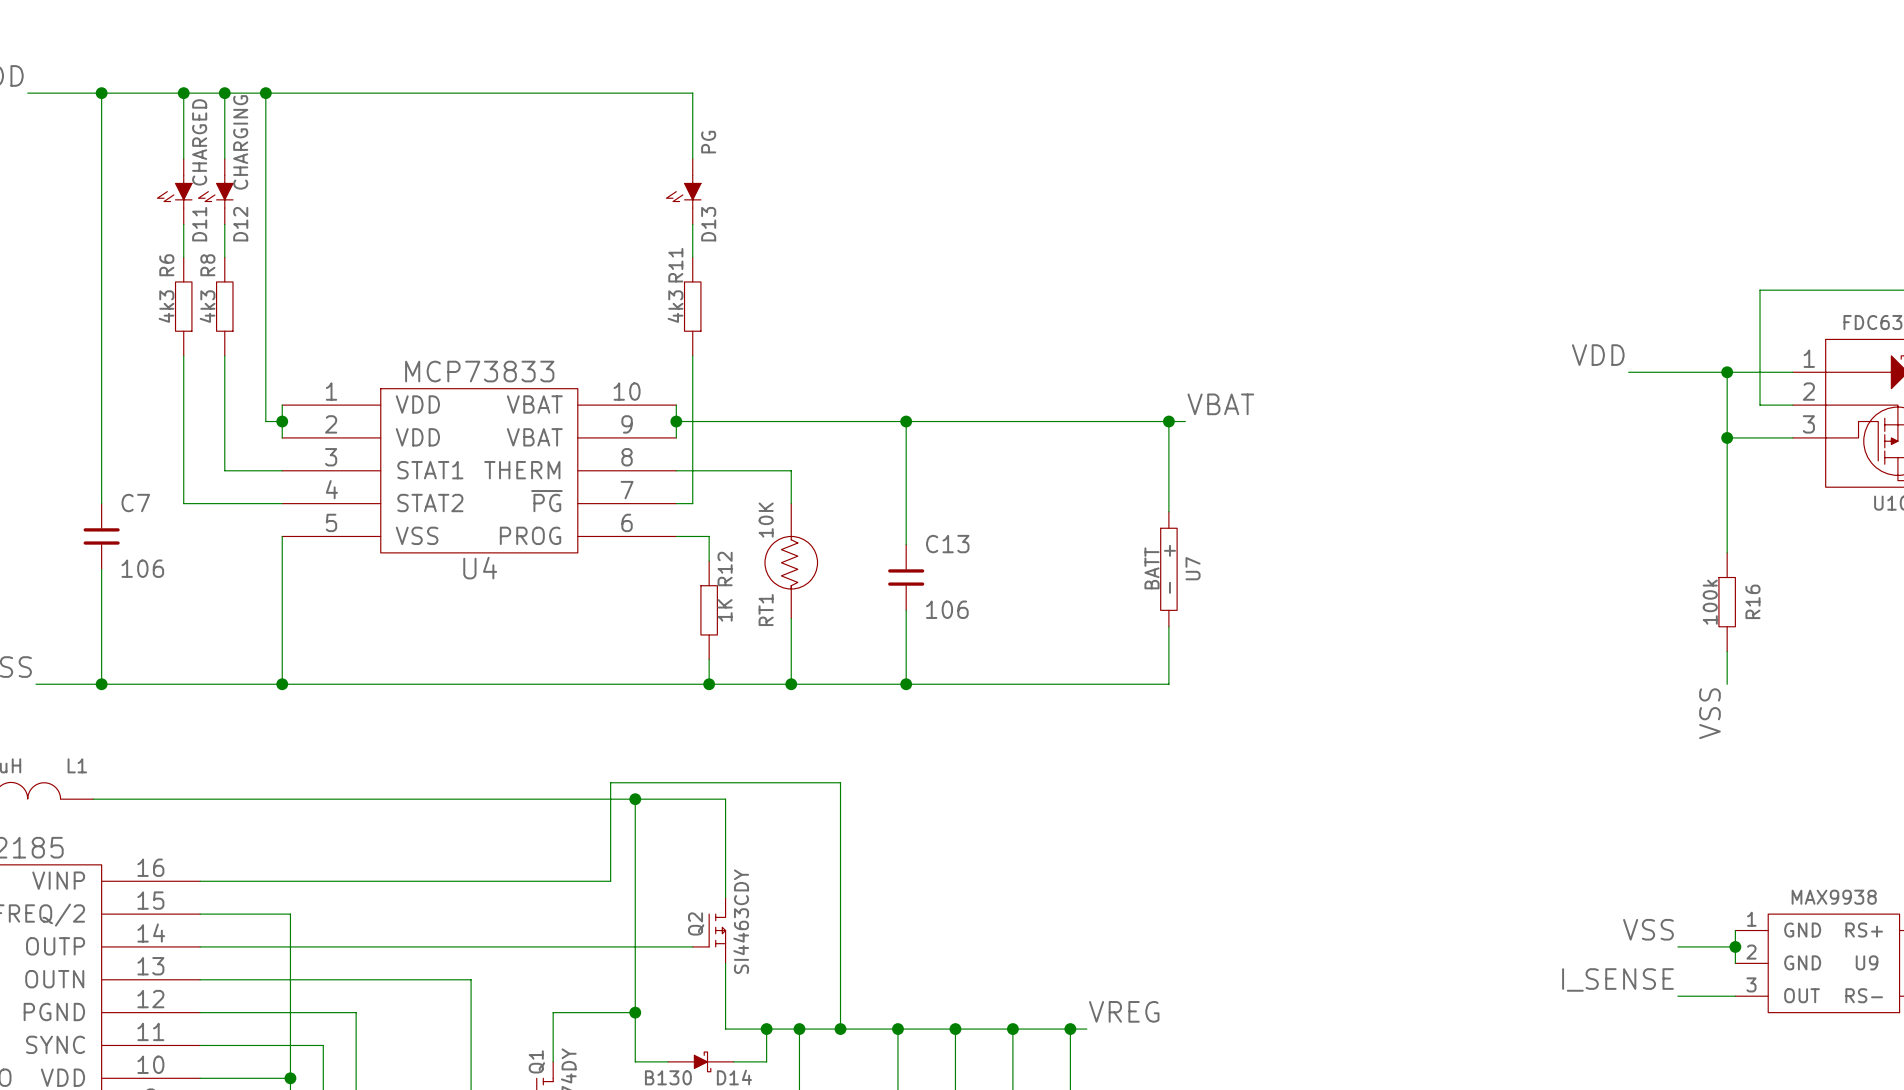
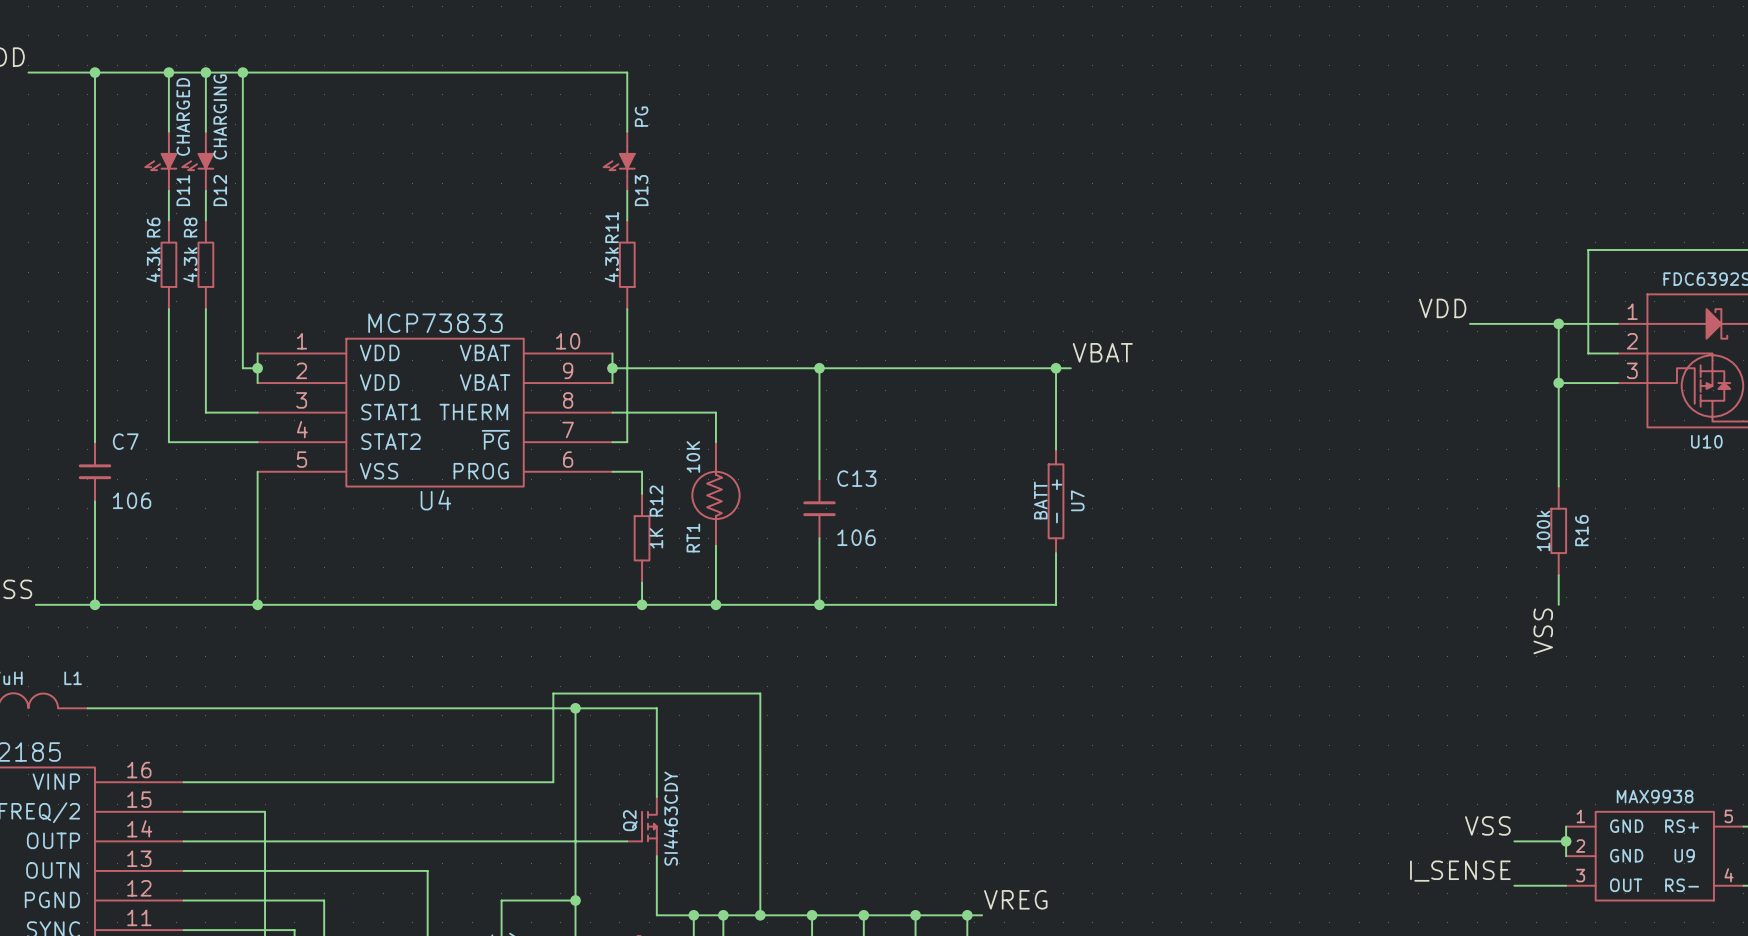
R6 value: 4k3 (166, 306) -> 4.3k (153, 264)
R8 value: 4k3 (207, 306) -> 4.3k (190, 264)
R11 value: 4k3 (675, 306) -> 4.3k (611, 264)

